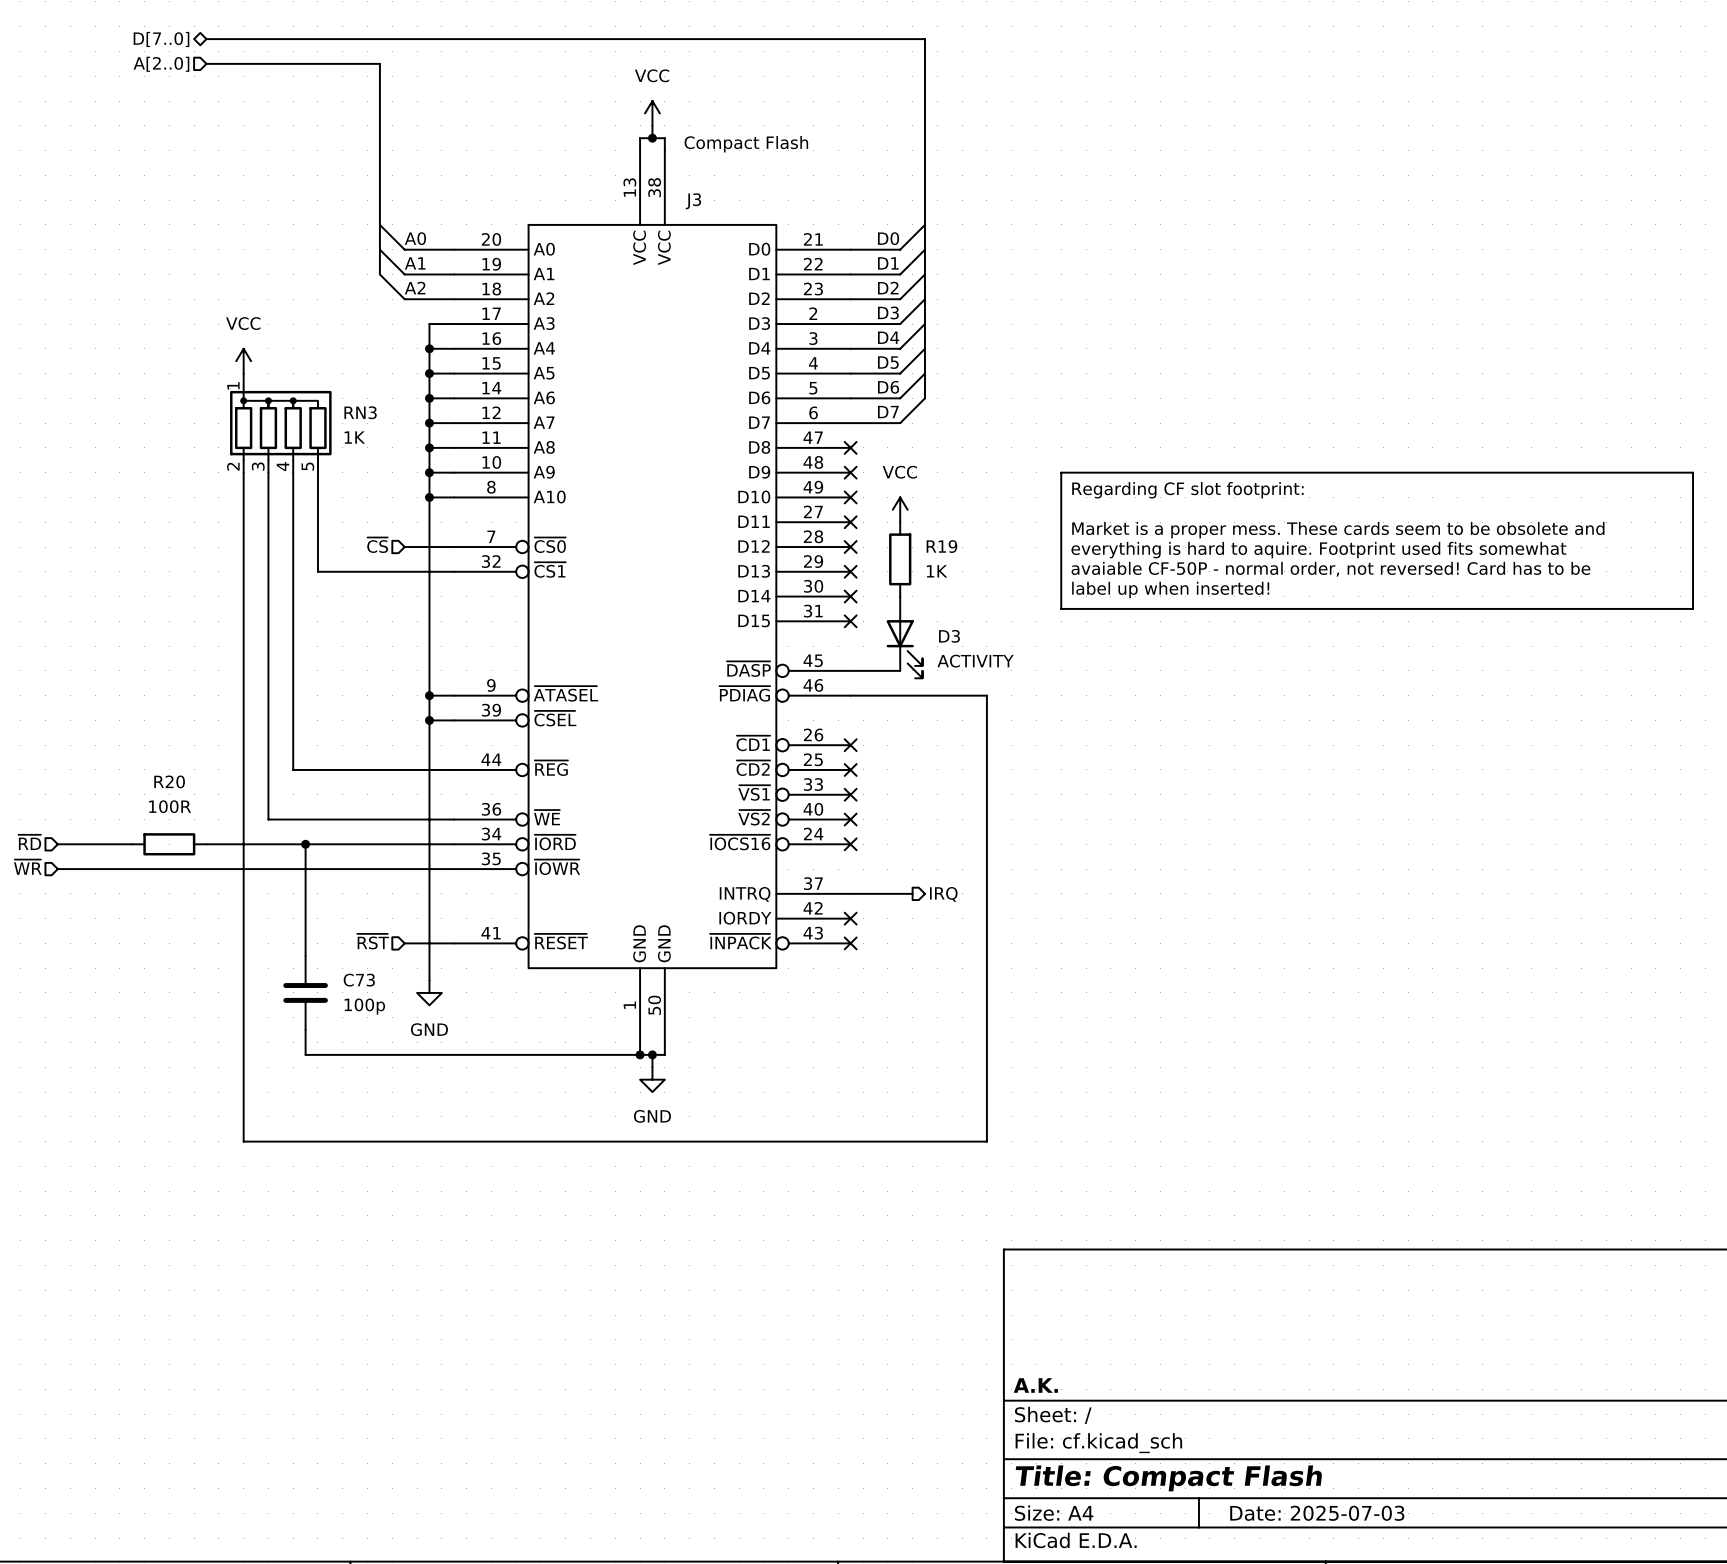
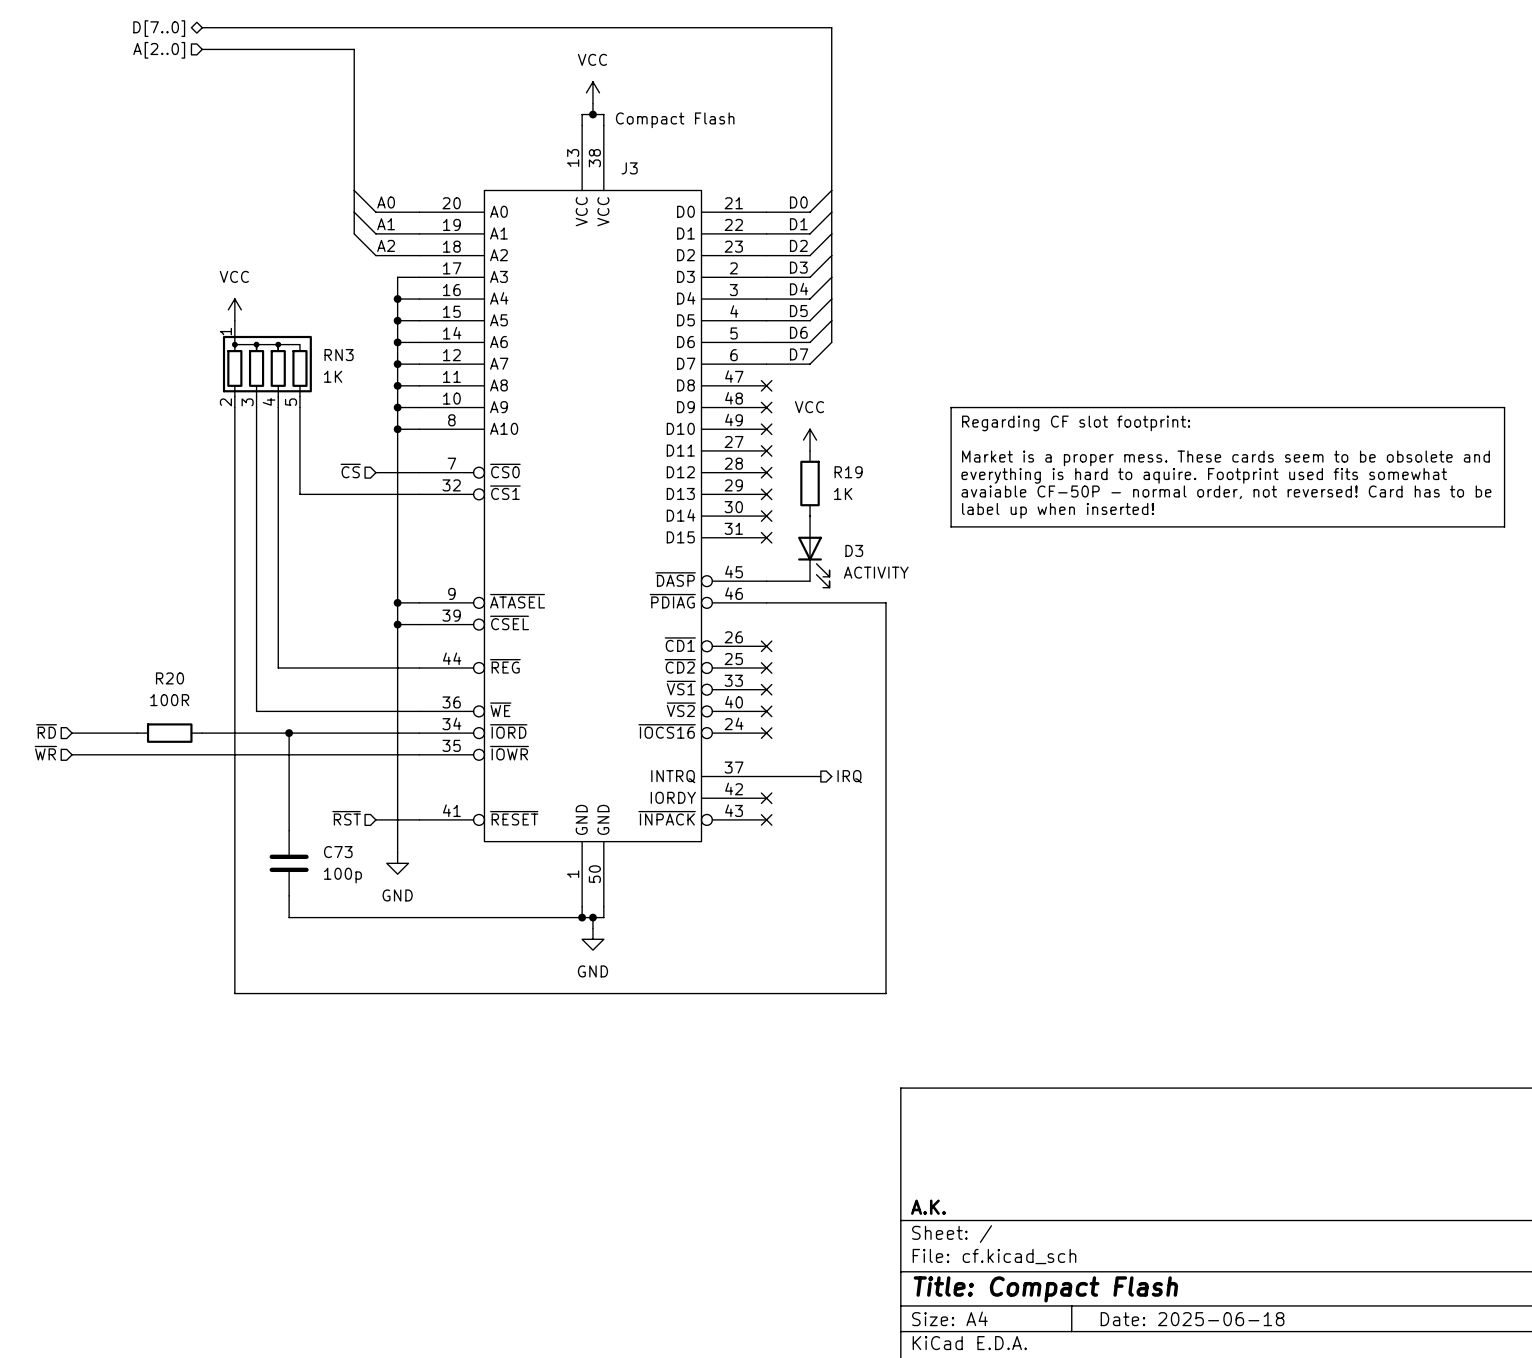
title block: Date: 2025-07-03 (1317, 1513) -> Date: 2025-06-18 (1192, 1319)

